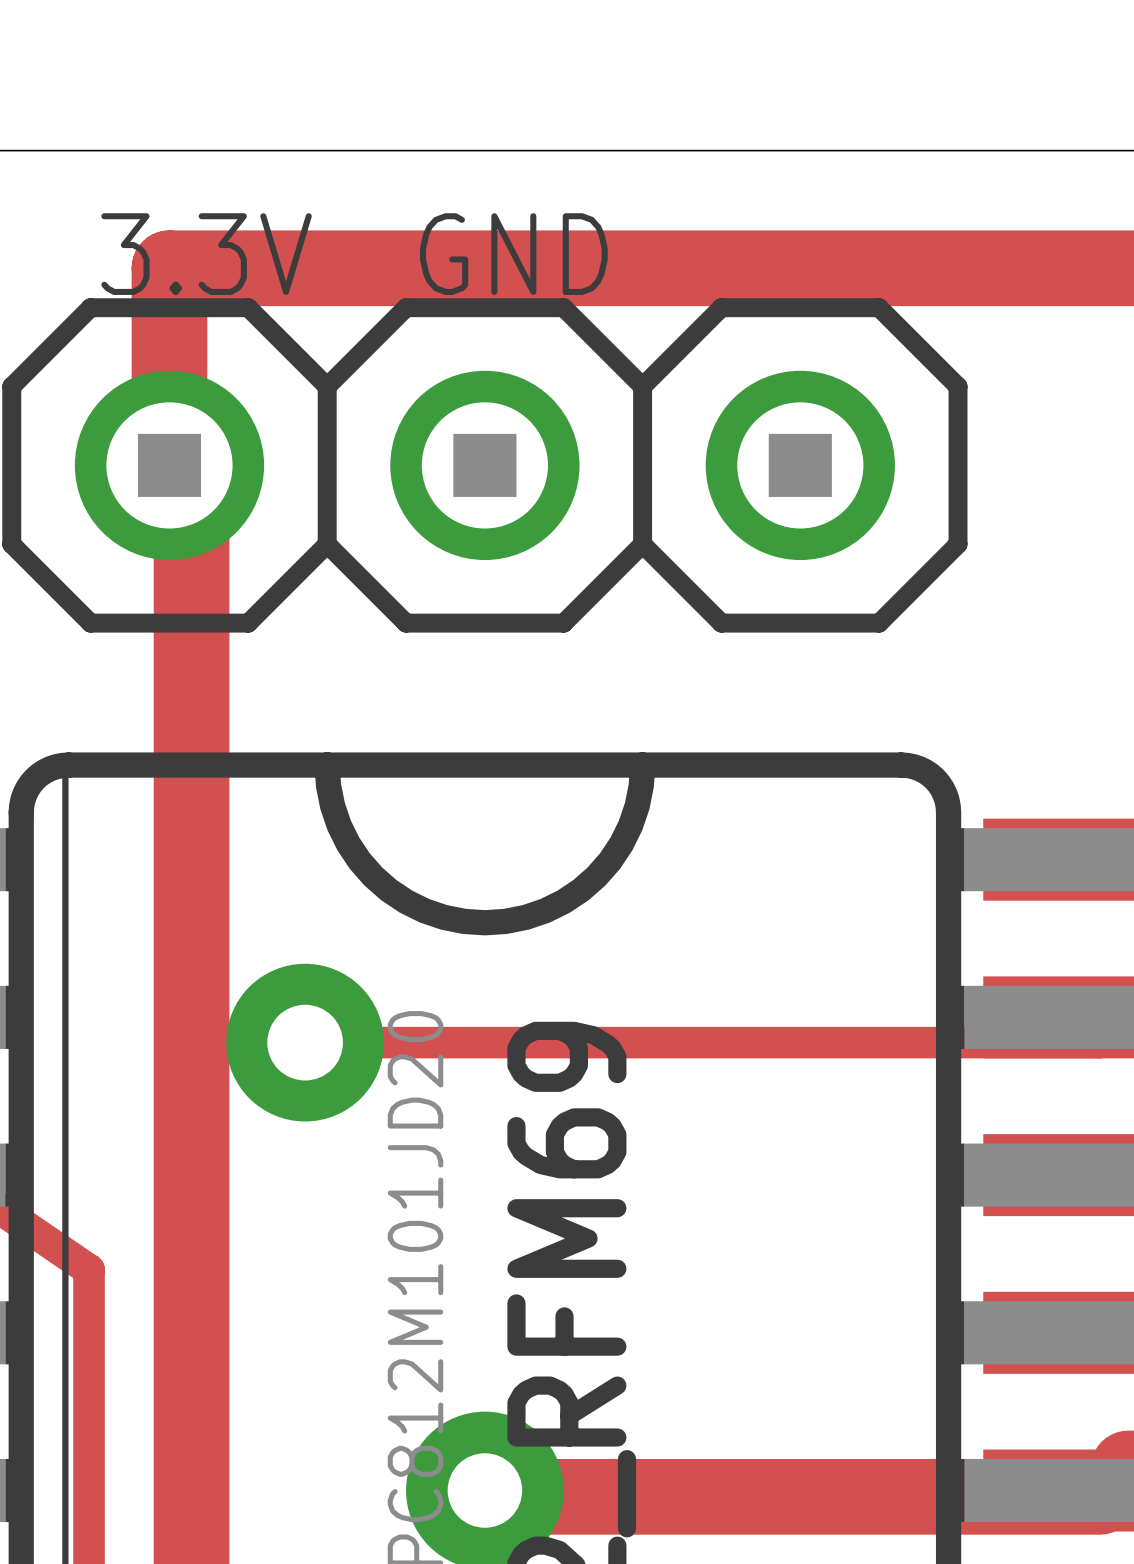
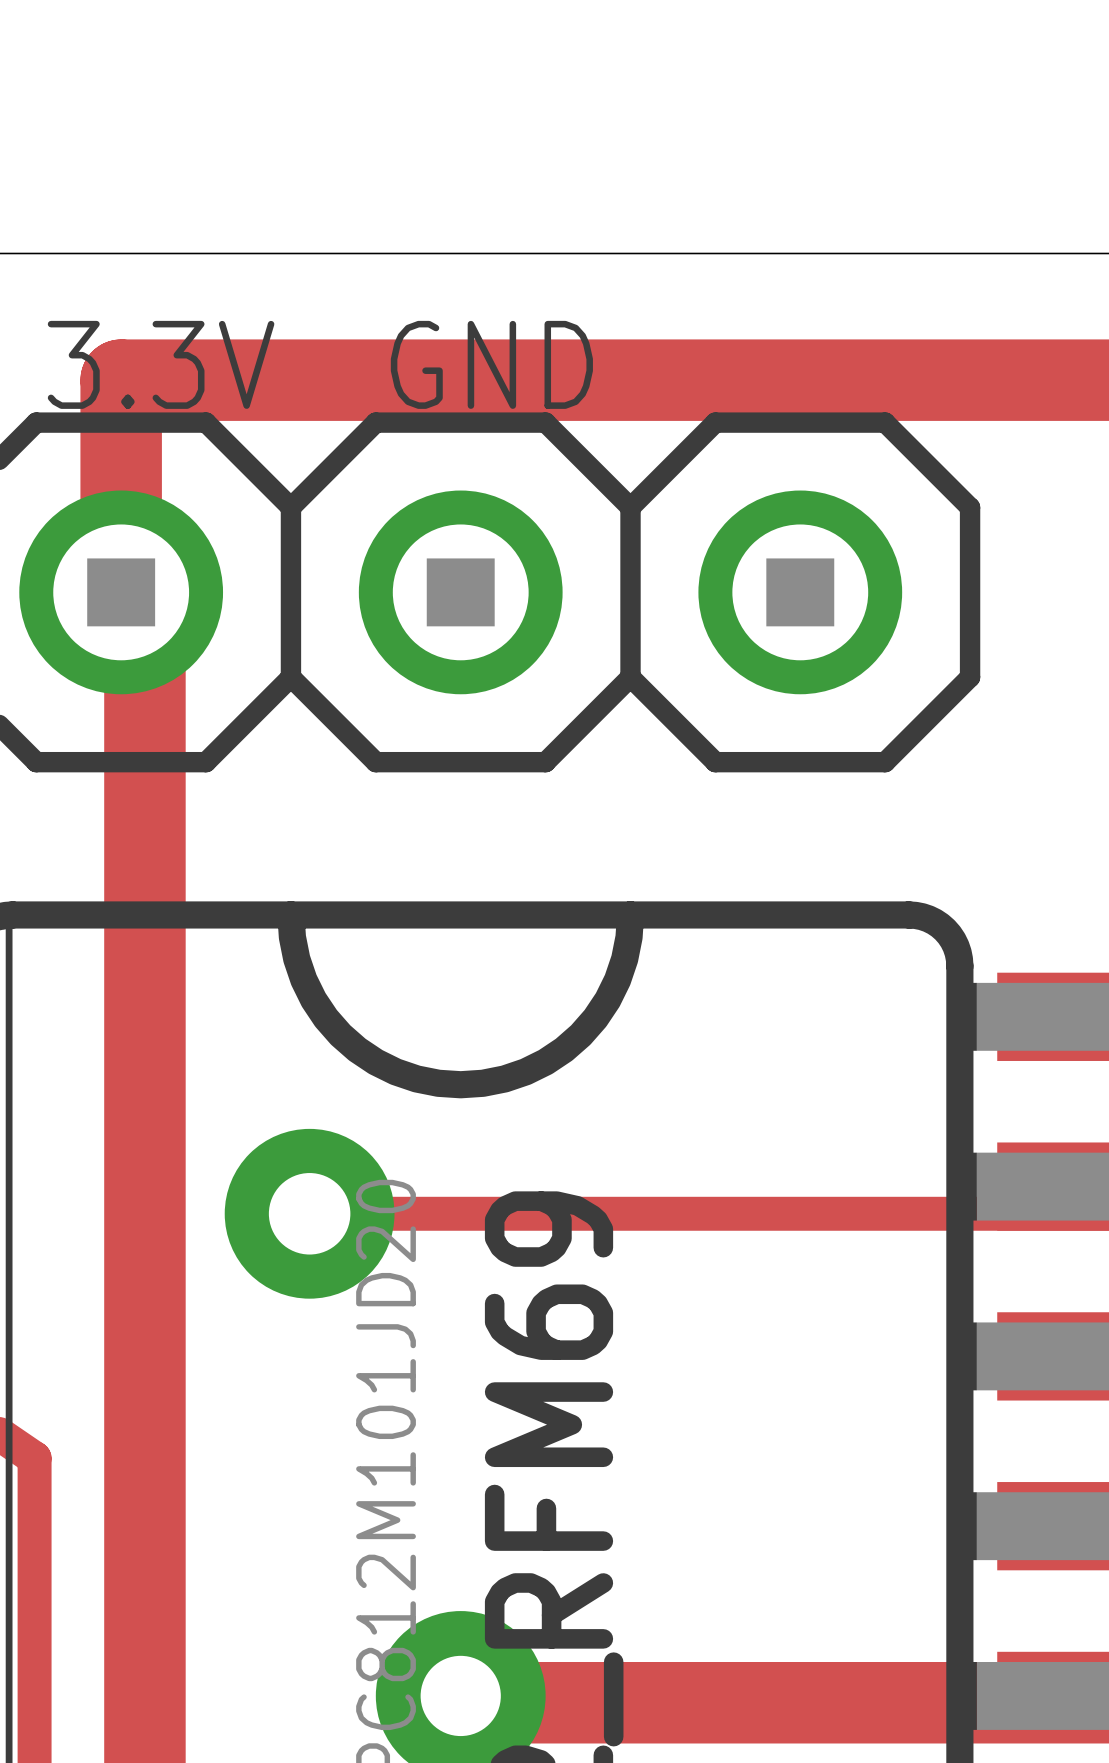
via position: (305, 1042) -> (309, 1213)

